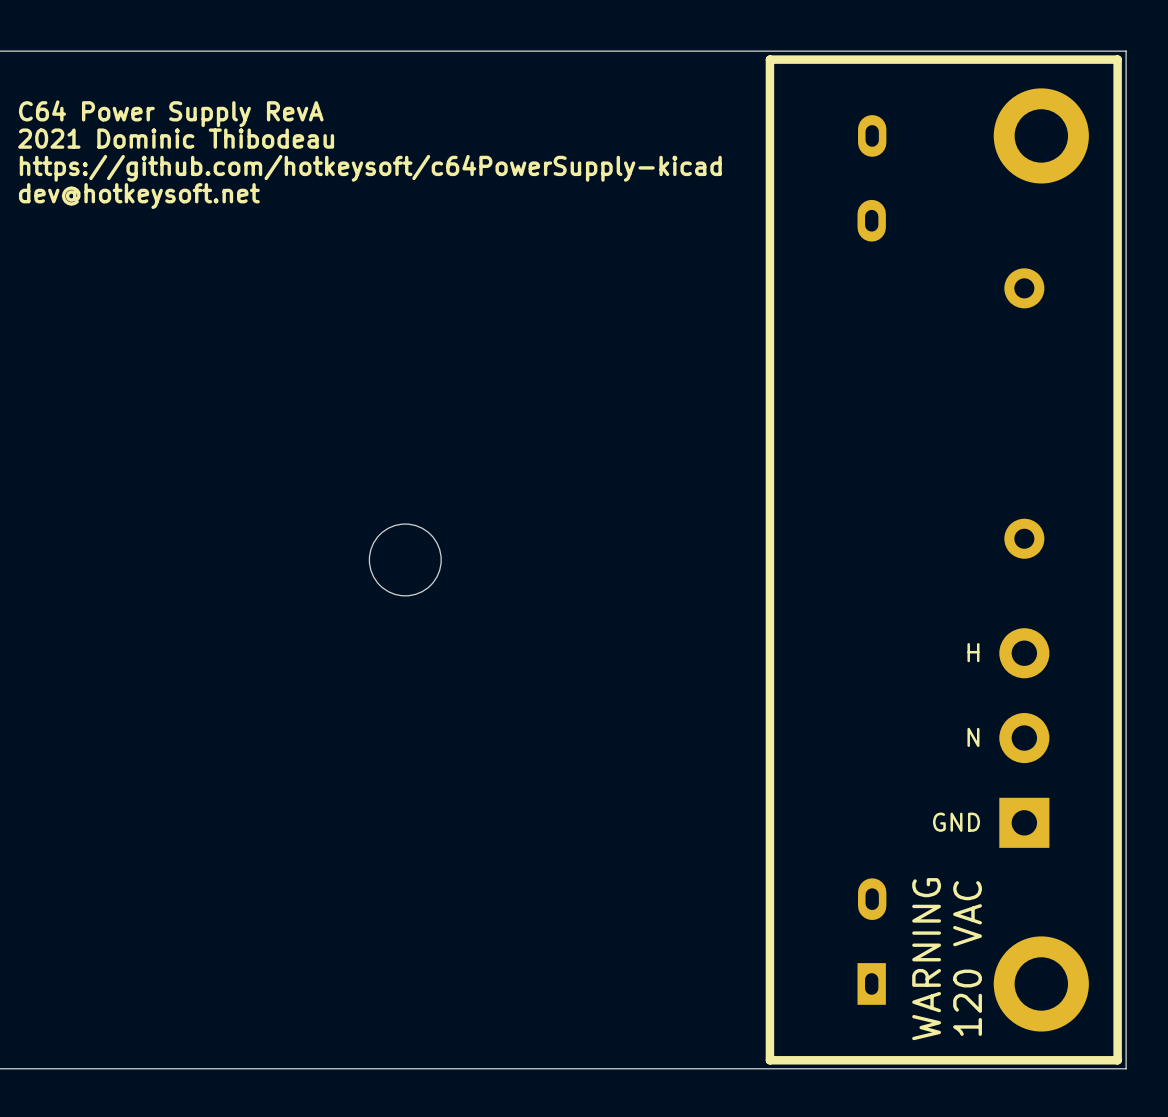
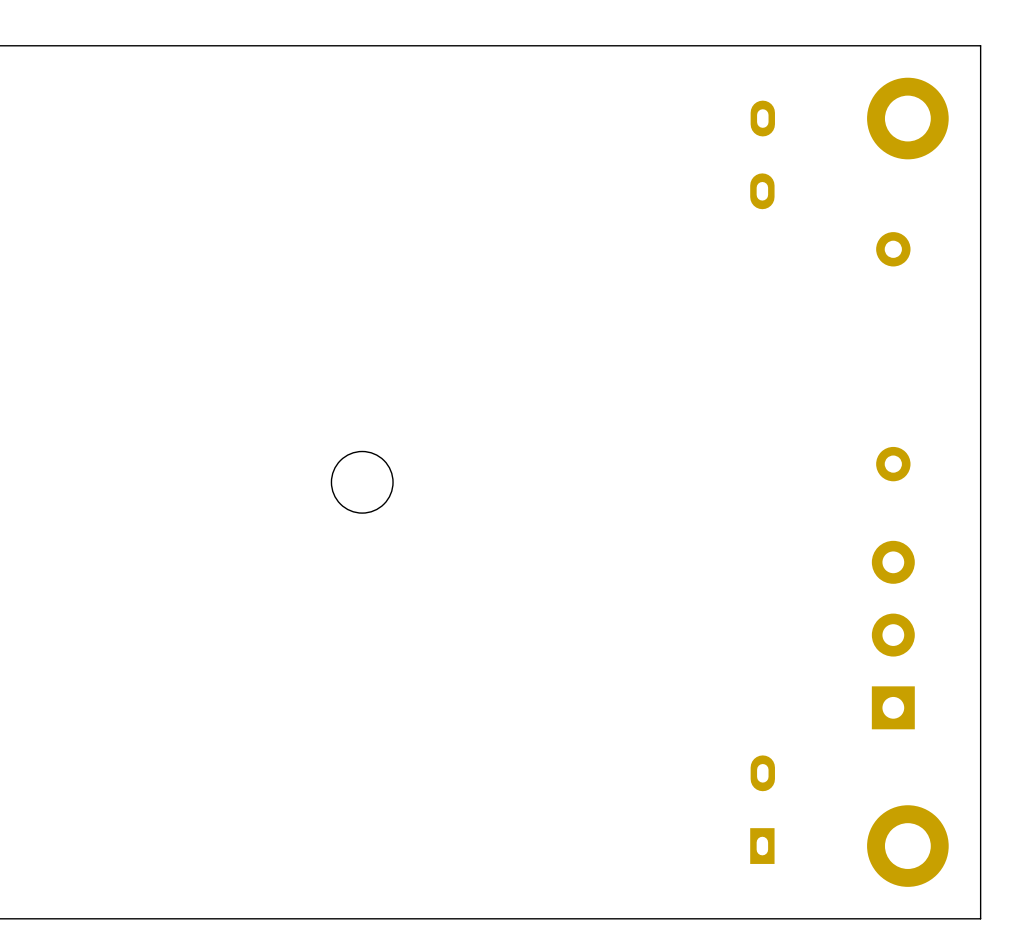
line: (1117, 59) (1117, 1060) (769, 1060) (769, 59) (1117, 59) -> none
text: C64 Power Supply RevA (171, 113) -> none
text: 2021 Dominic Thibodeau (176, 138) -> none
text: https://github.com/hotkeysoft/c64PowerSupply-kicad (370, 168) -> none
text: dev@hotkeysoft.net (139, 196) -> none
text: H (973, 652) -> none
text: N (973, 737) -> none
text: GND (956, 822) -> none
text: 120 VAC (967, 958) -> none
text: WARNING (926, 959) -> none

